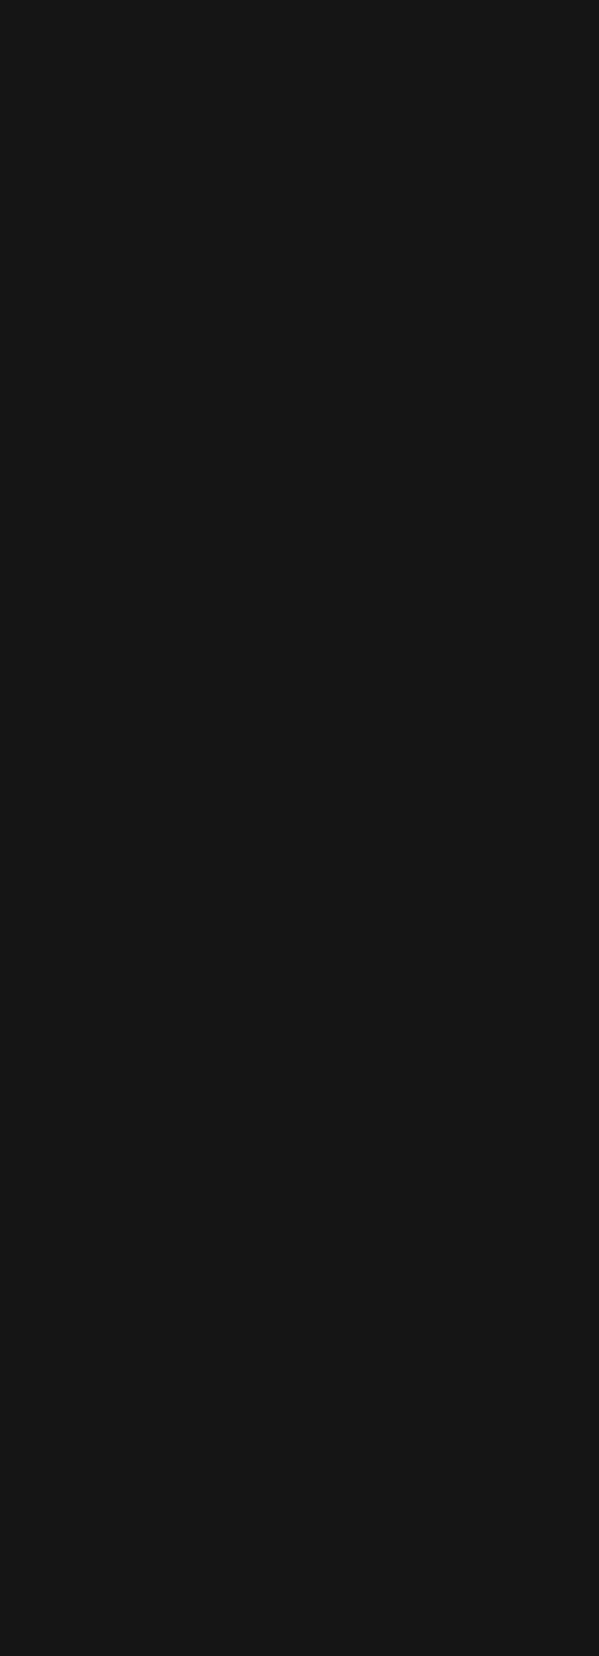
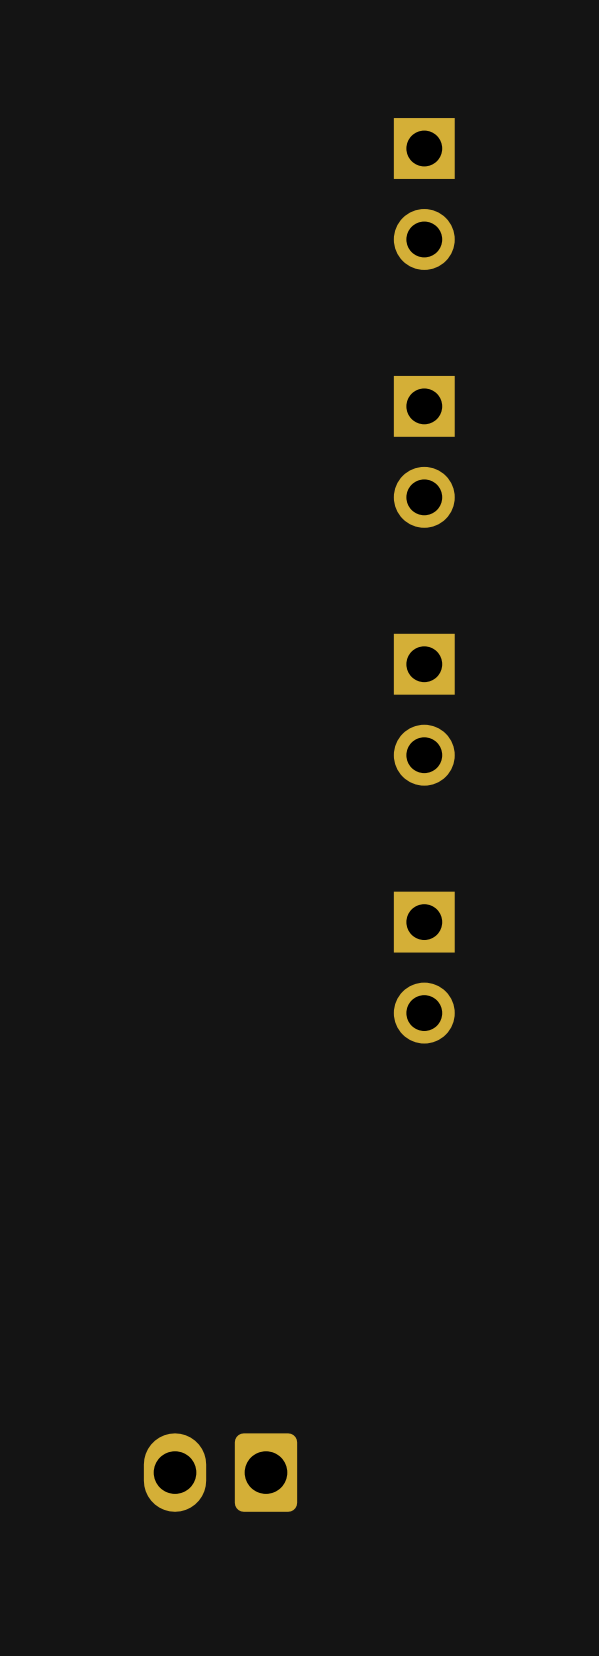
part: none -> (424, 193)
part: none -> (424, 451)
part: none -> (424, 709)
part: none -> (424, 967)
part: none -> (220, 1472)

